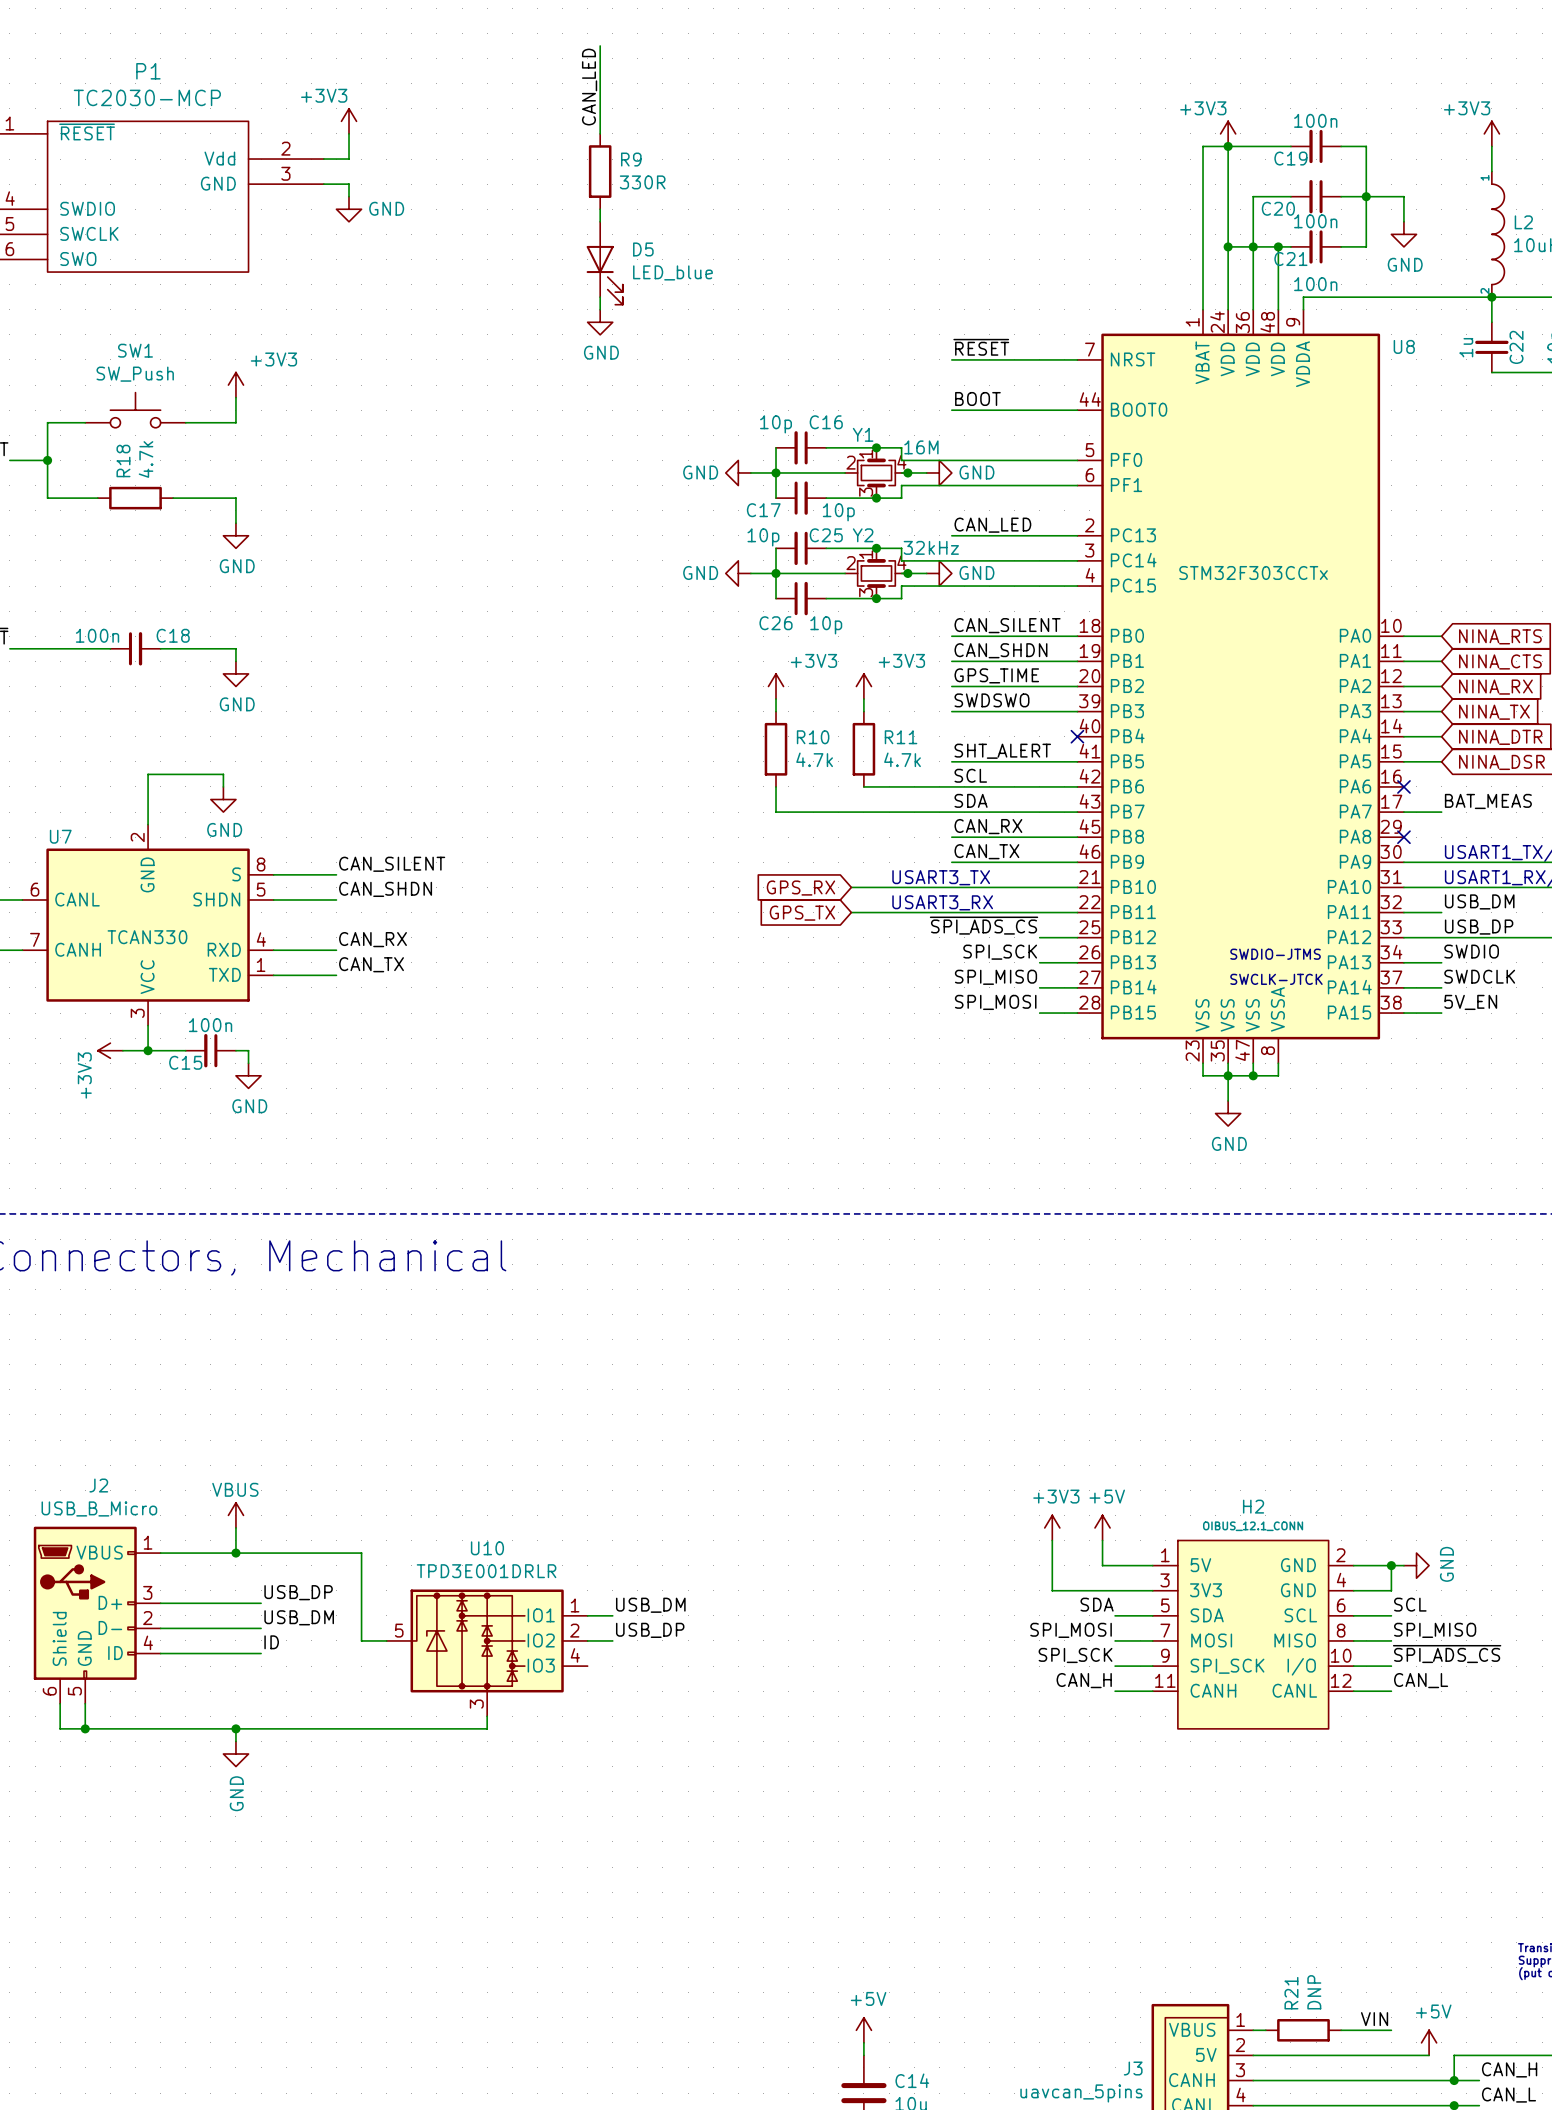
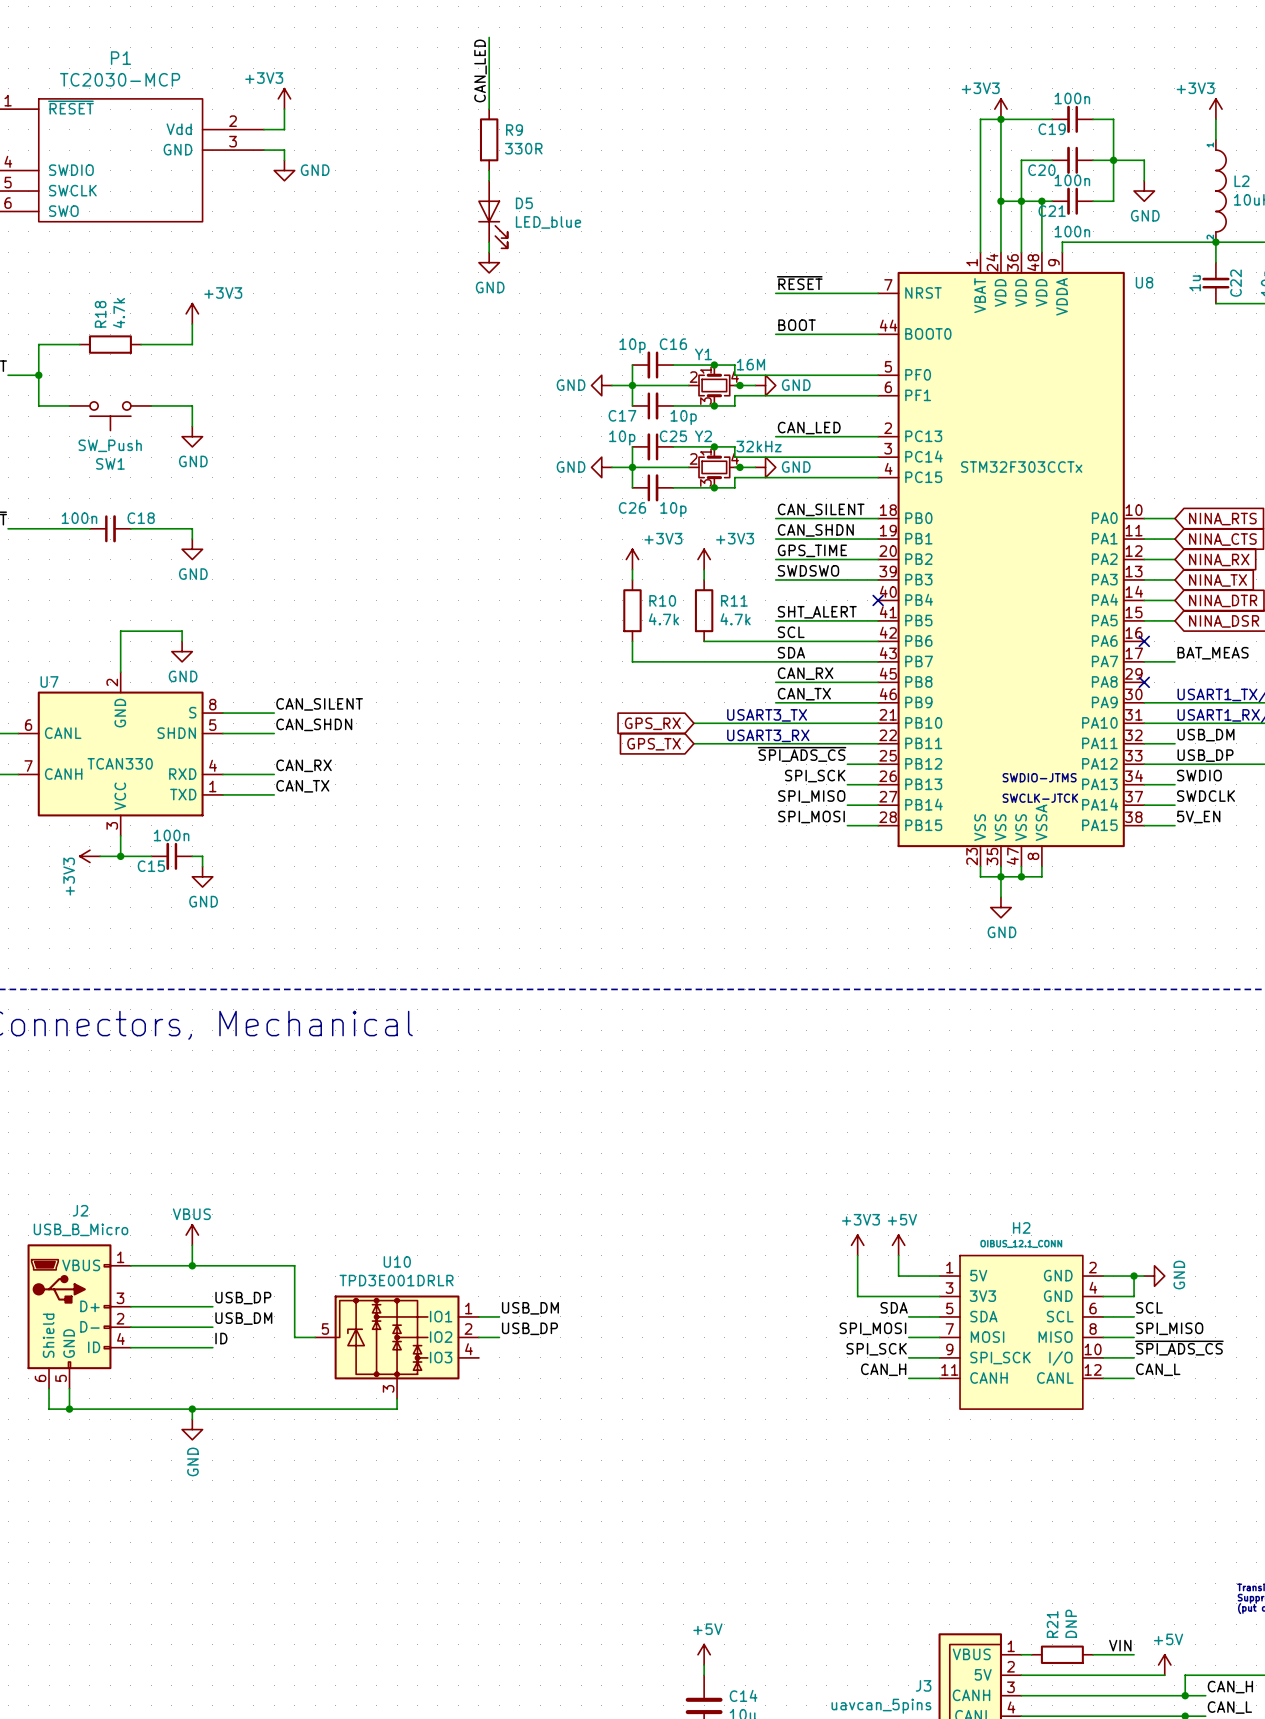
SW1 rotation: 0° (135, 410) -> 180° (110, 416)
SW1 position: (135, 410) -> (110, 416)
R18 position: (135, 498) -> (110, 344)

